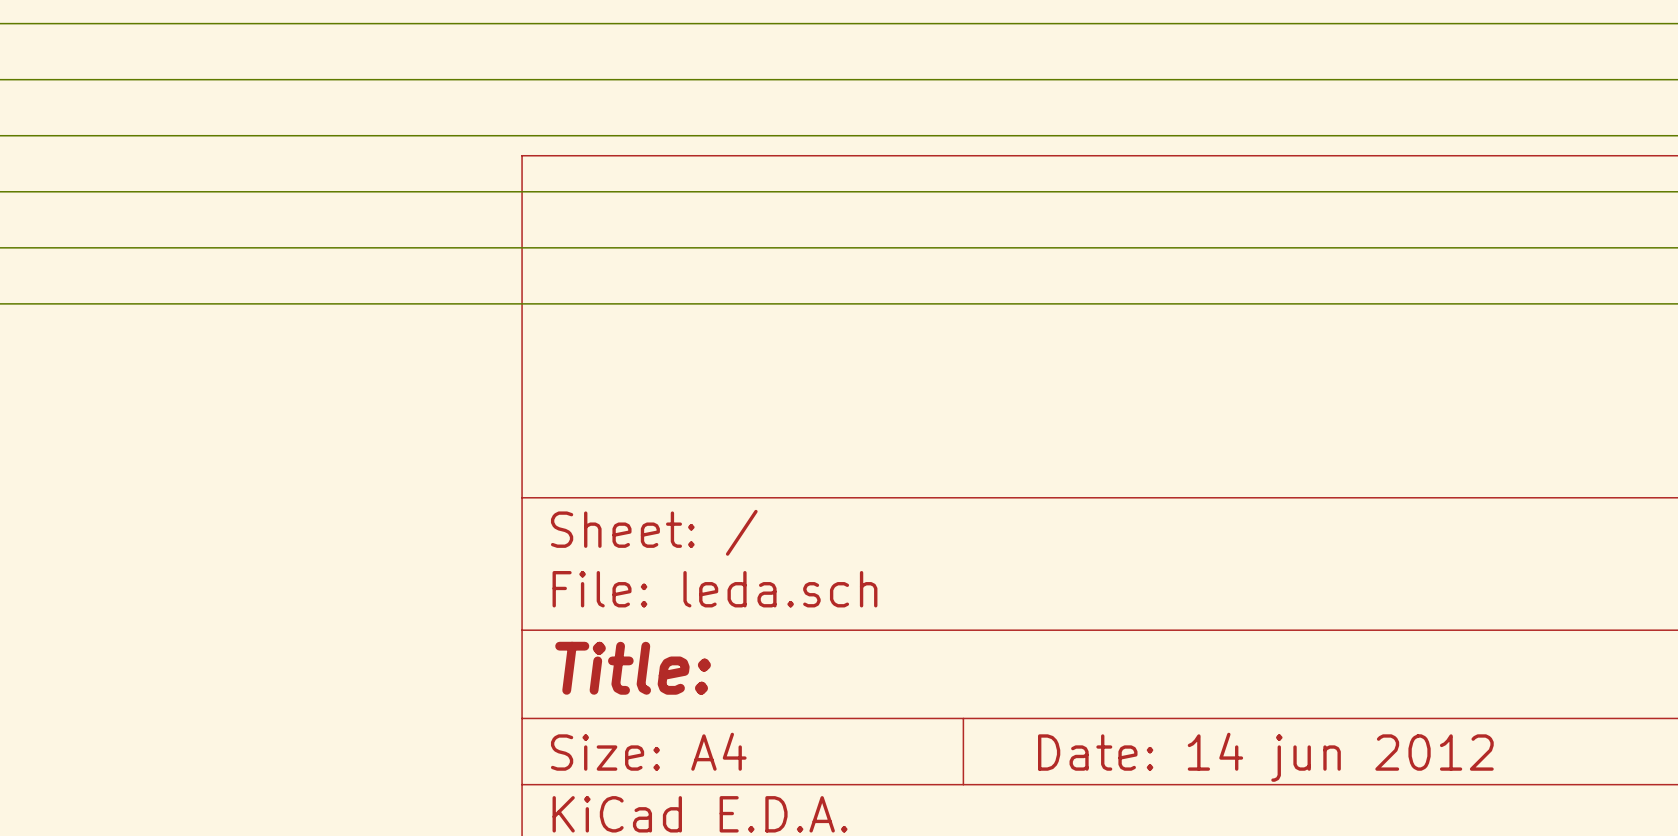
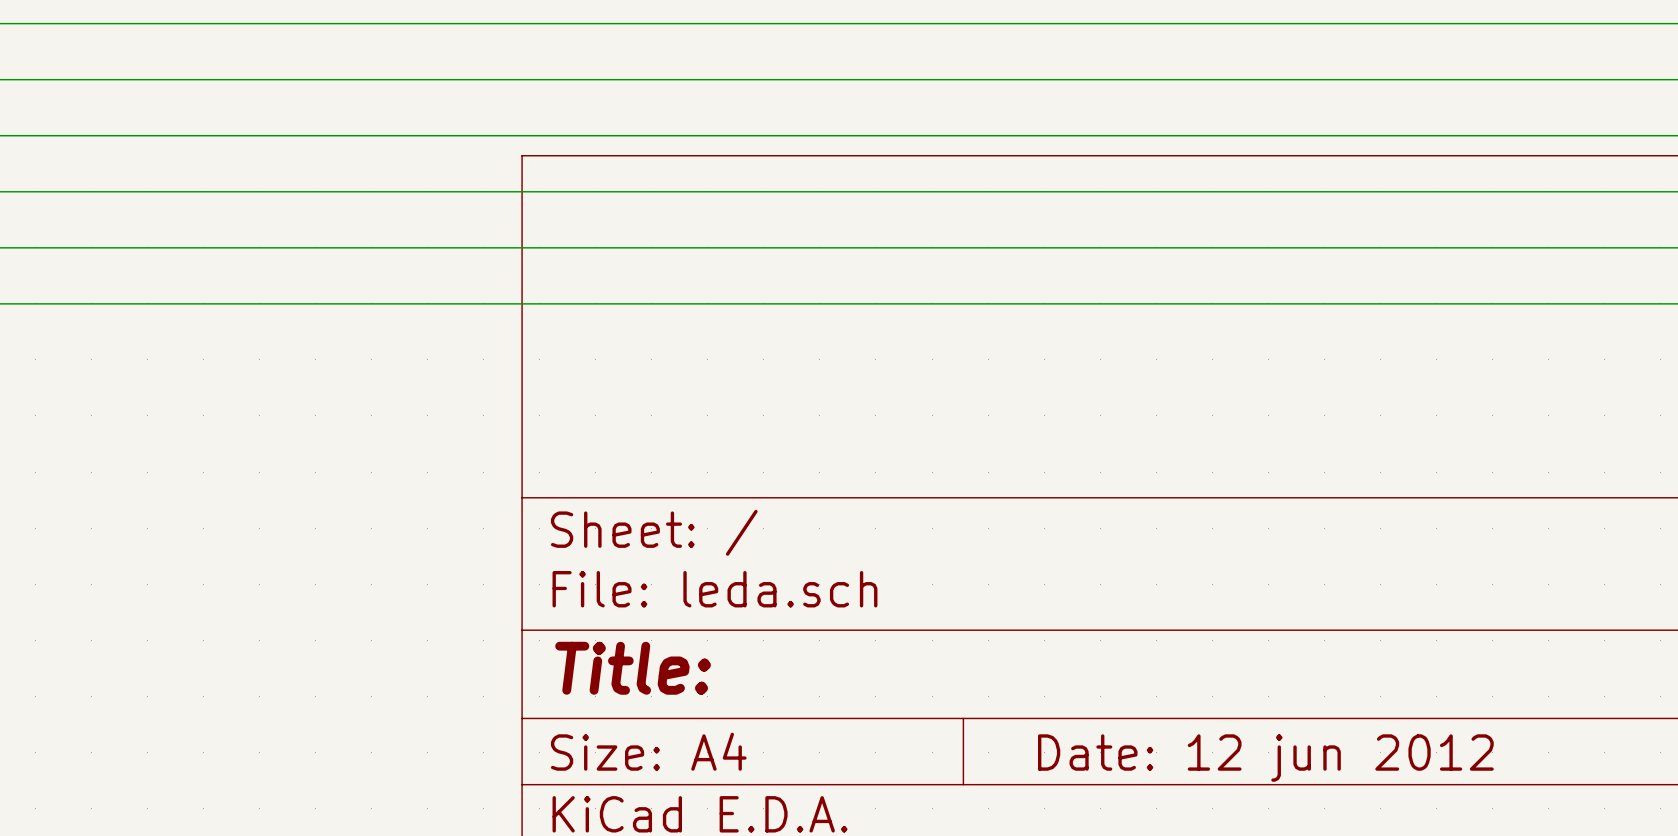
title block: Date: 14 jun 2012 (1265, 757) -> Date: 12 jun 2012 (1265, 758)

